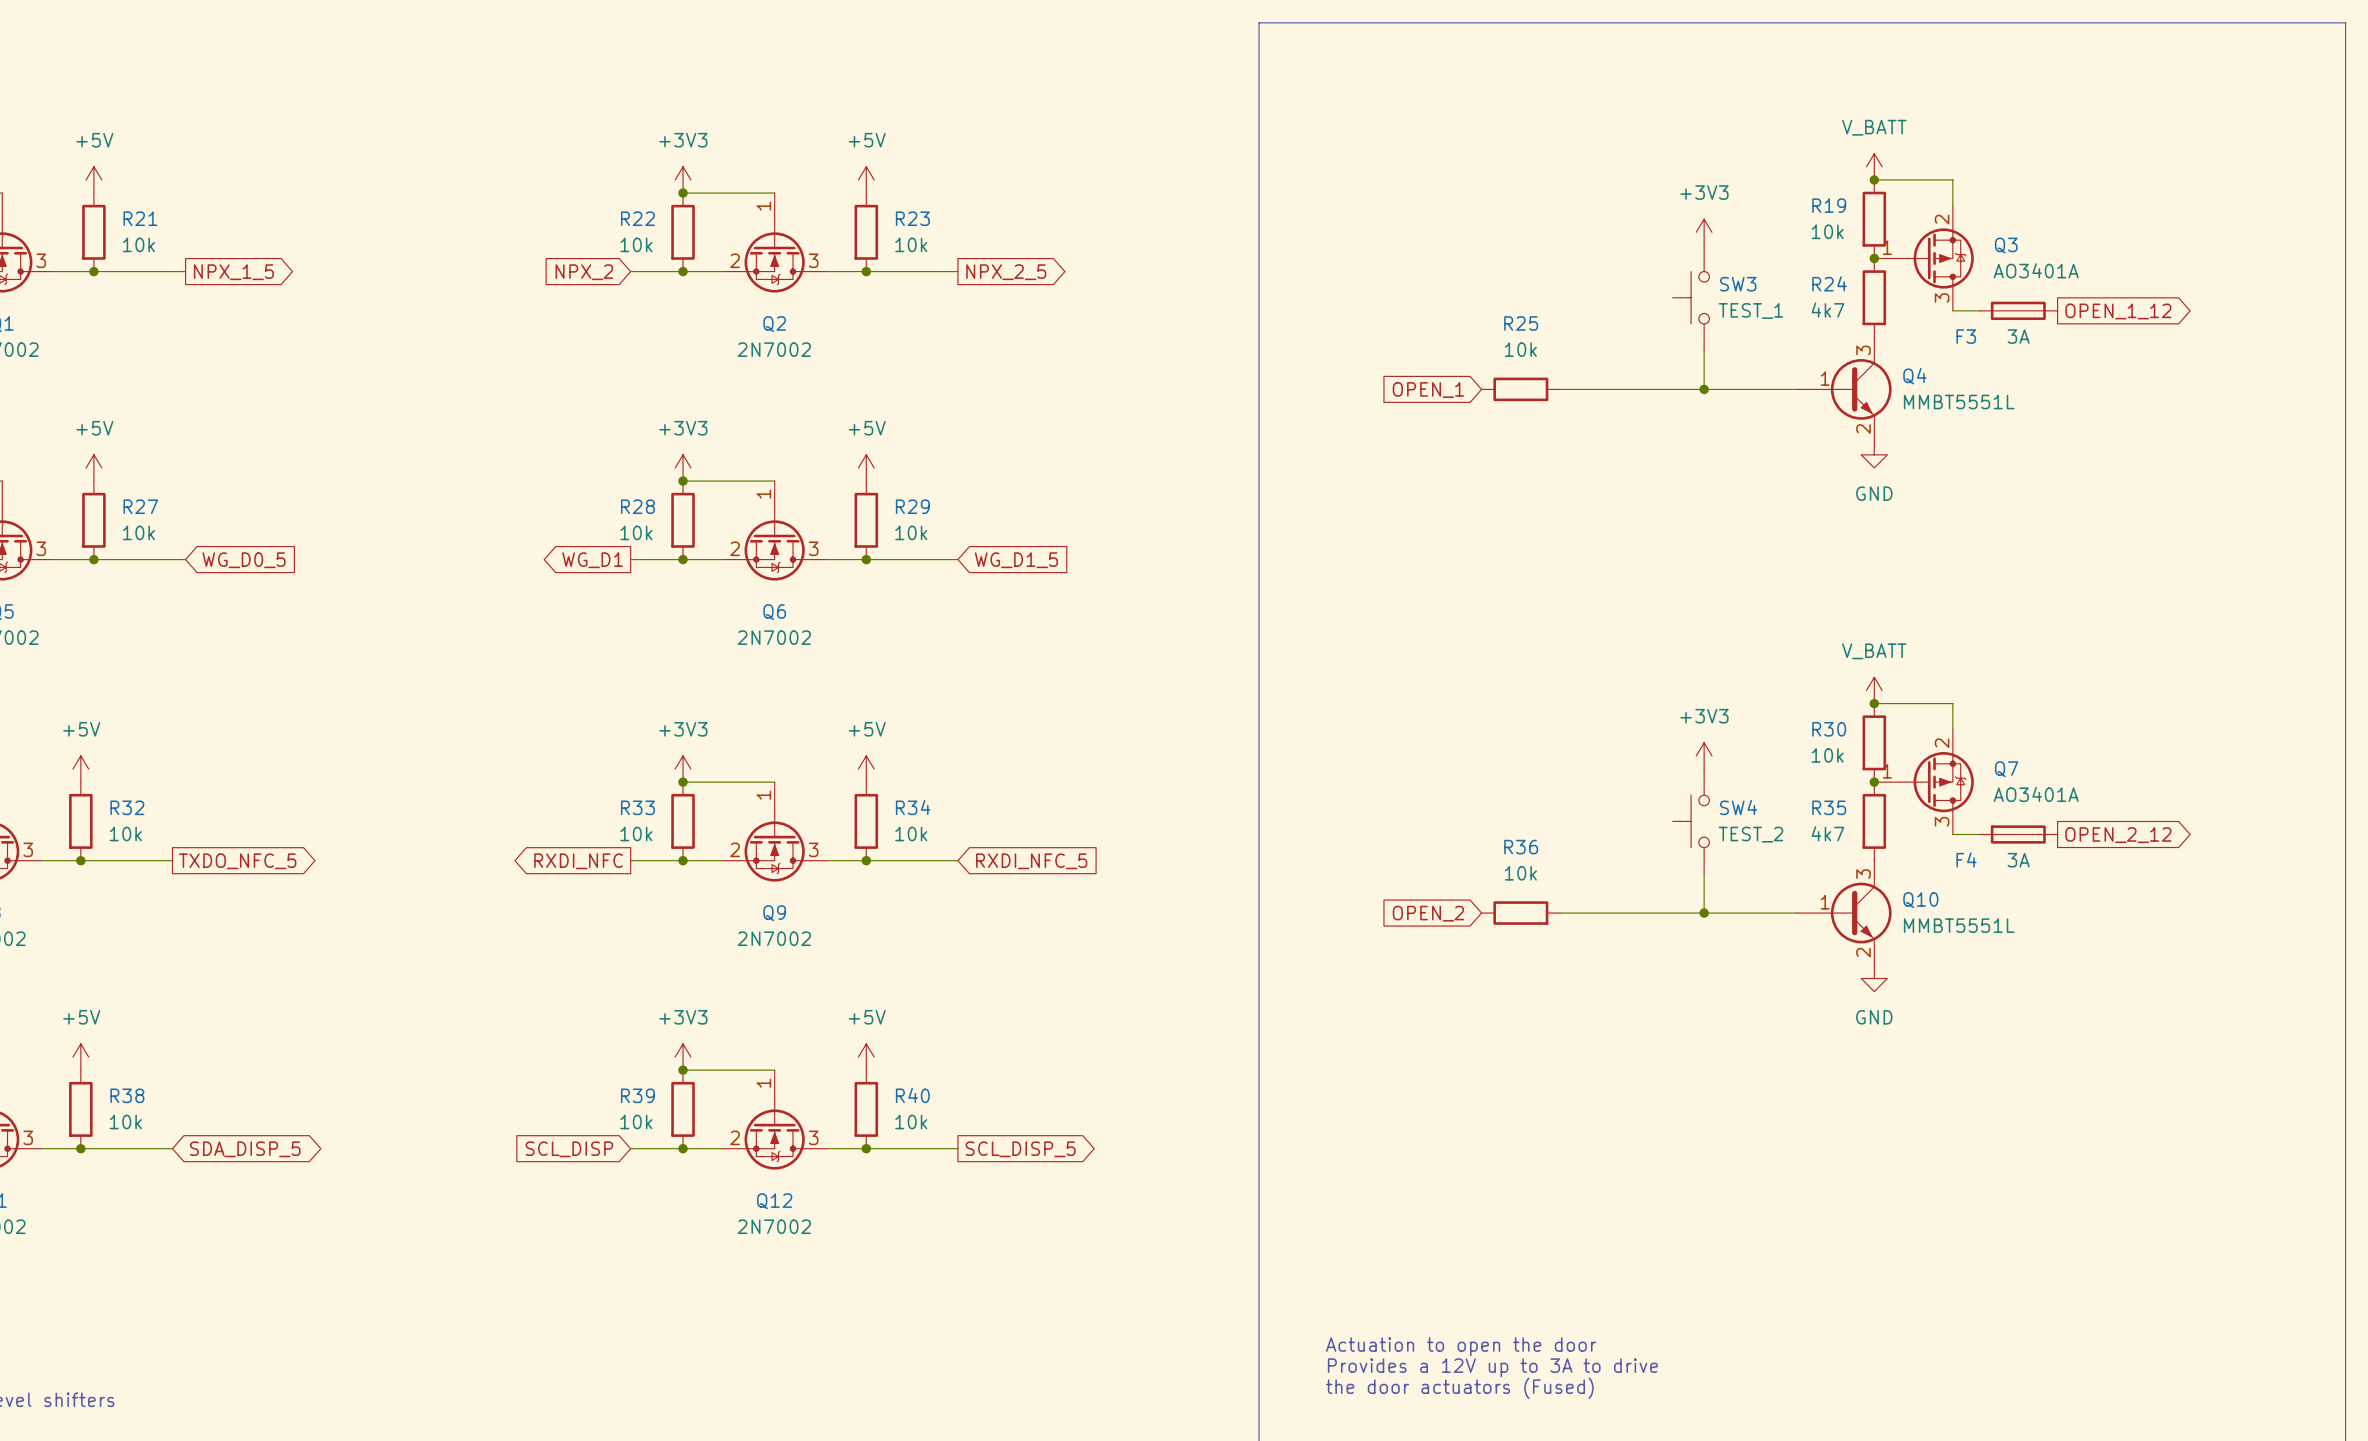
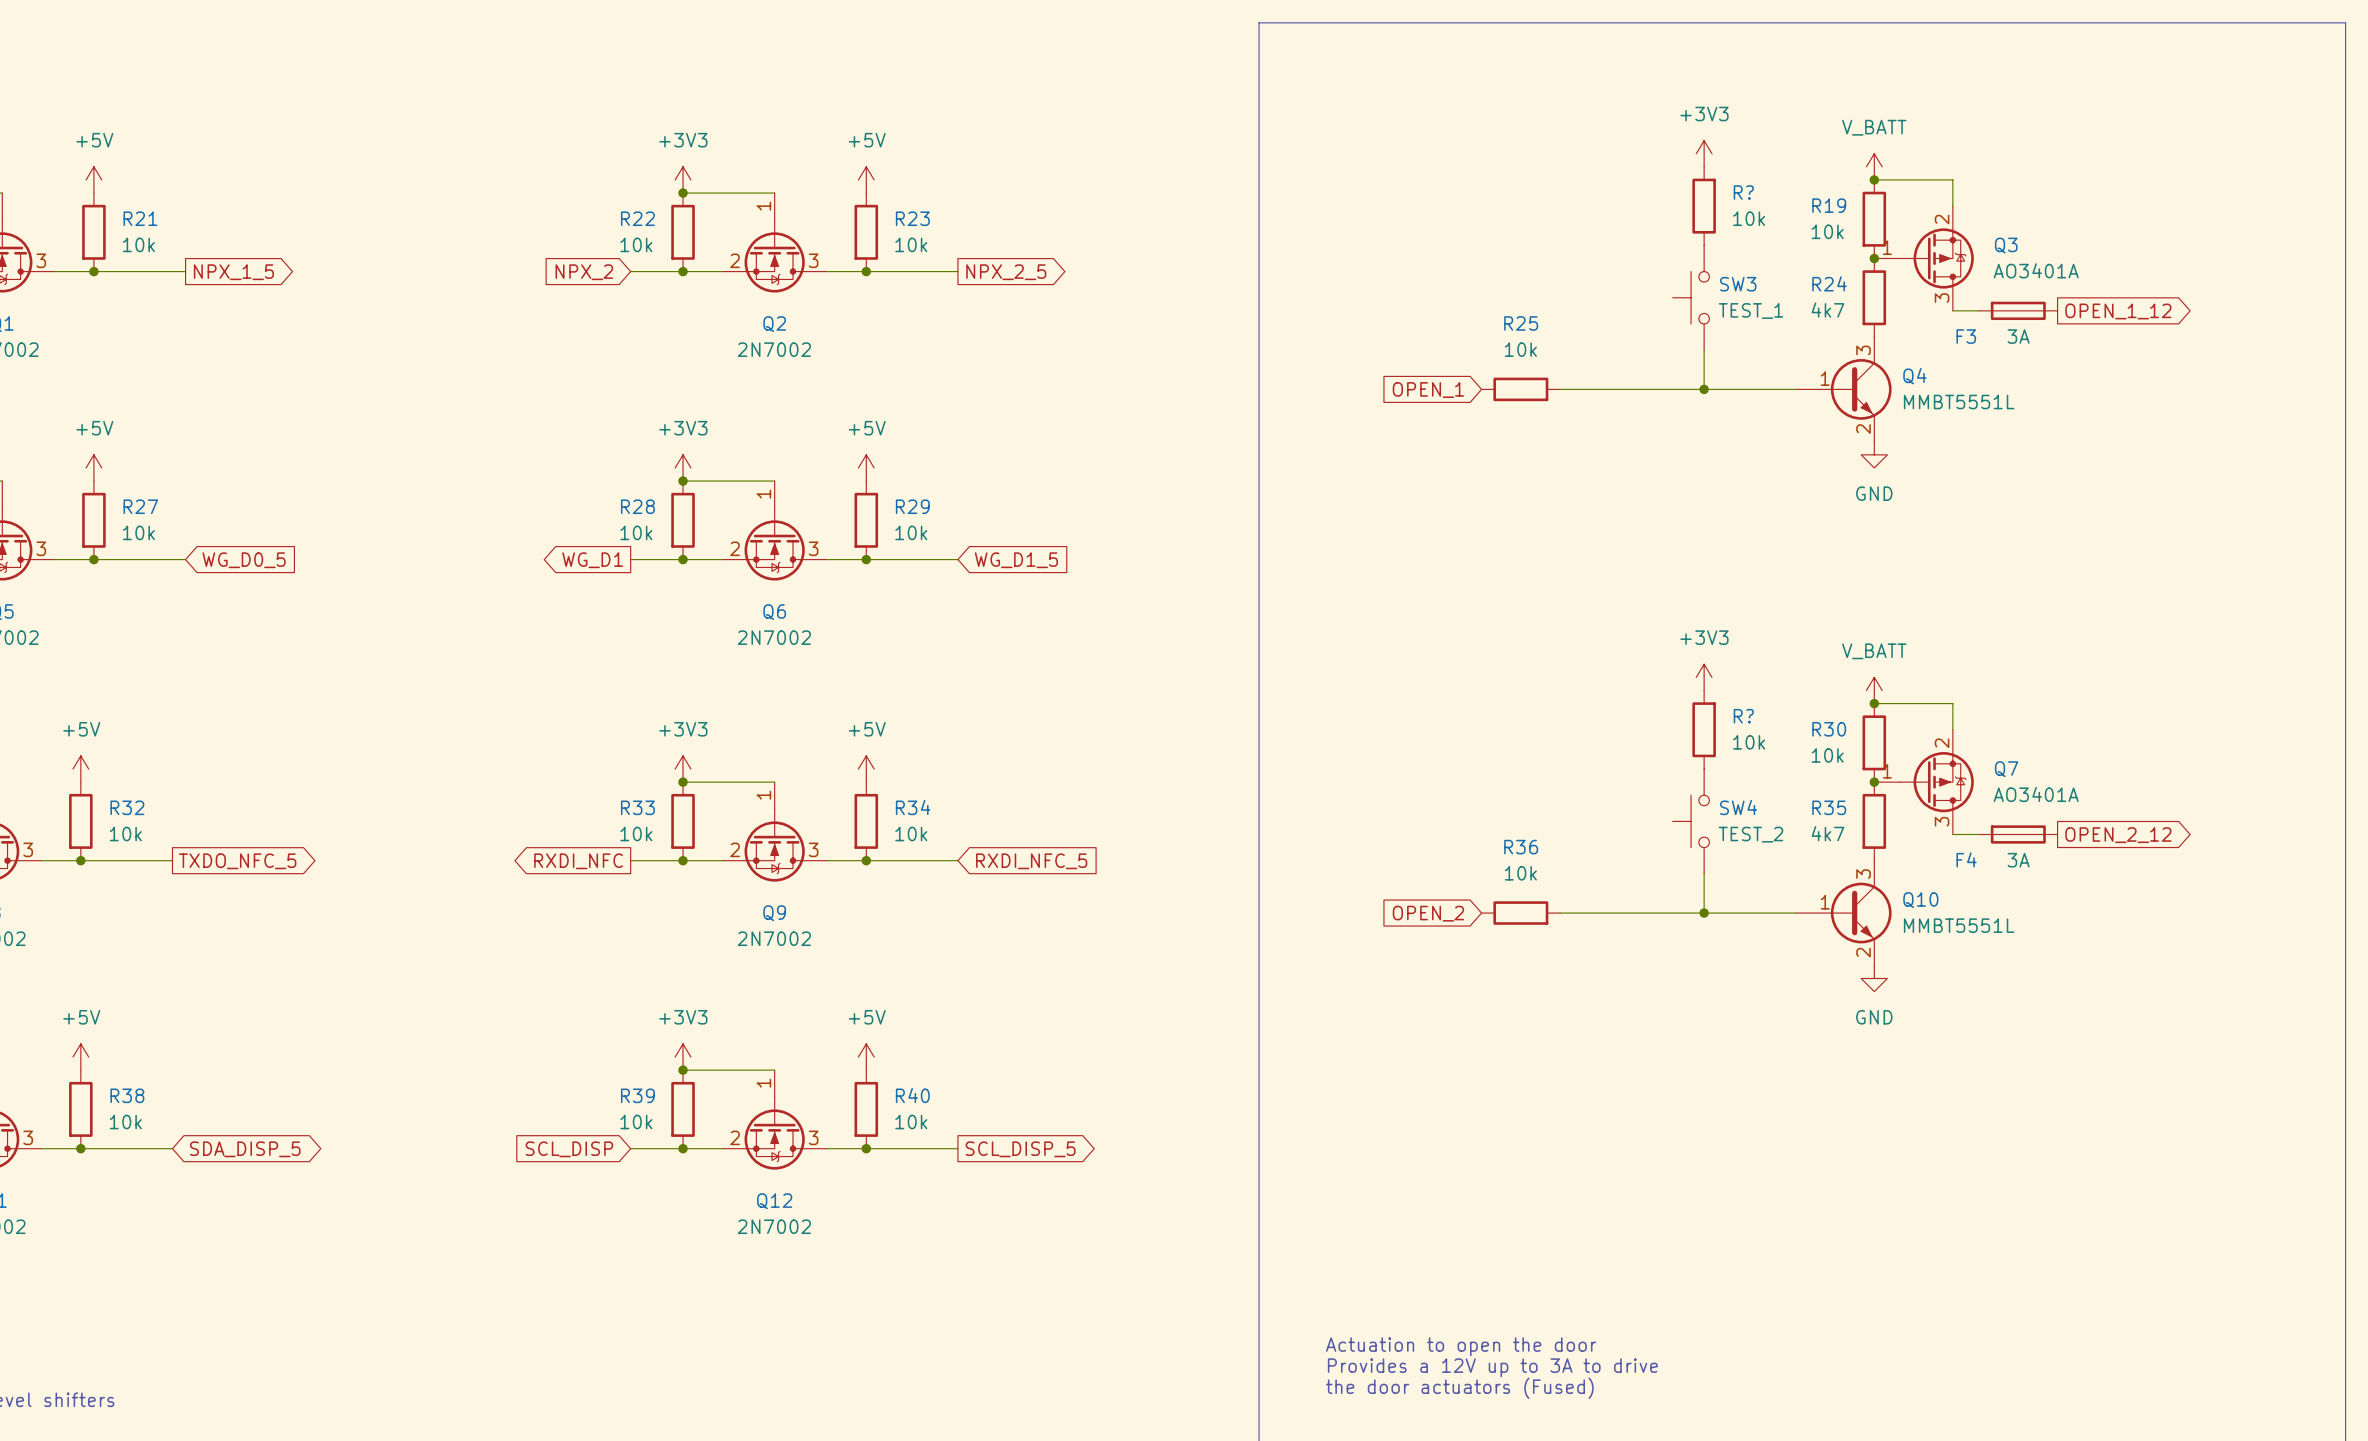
R?: none -> 10k (1704, 206)
power symbol position: +3V3 (1704, 232) -> +3V3 (1704, 153)
R?: none -> 10k (1704, 729)
power symbol position: +3V3 (1704, 755) -> +3V3 (1704, 677)

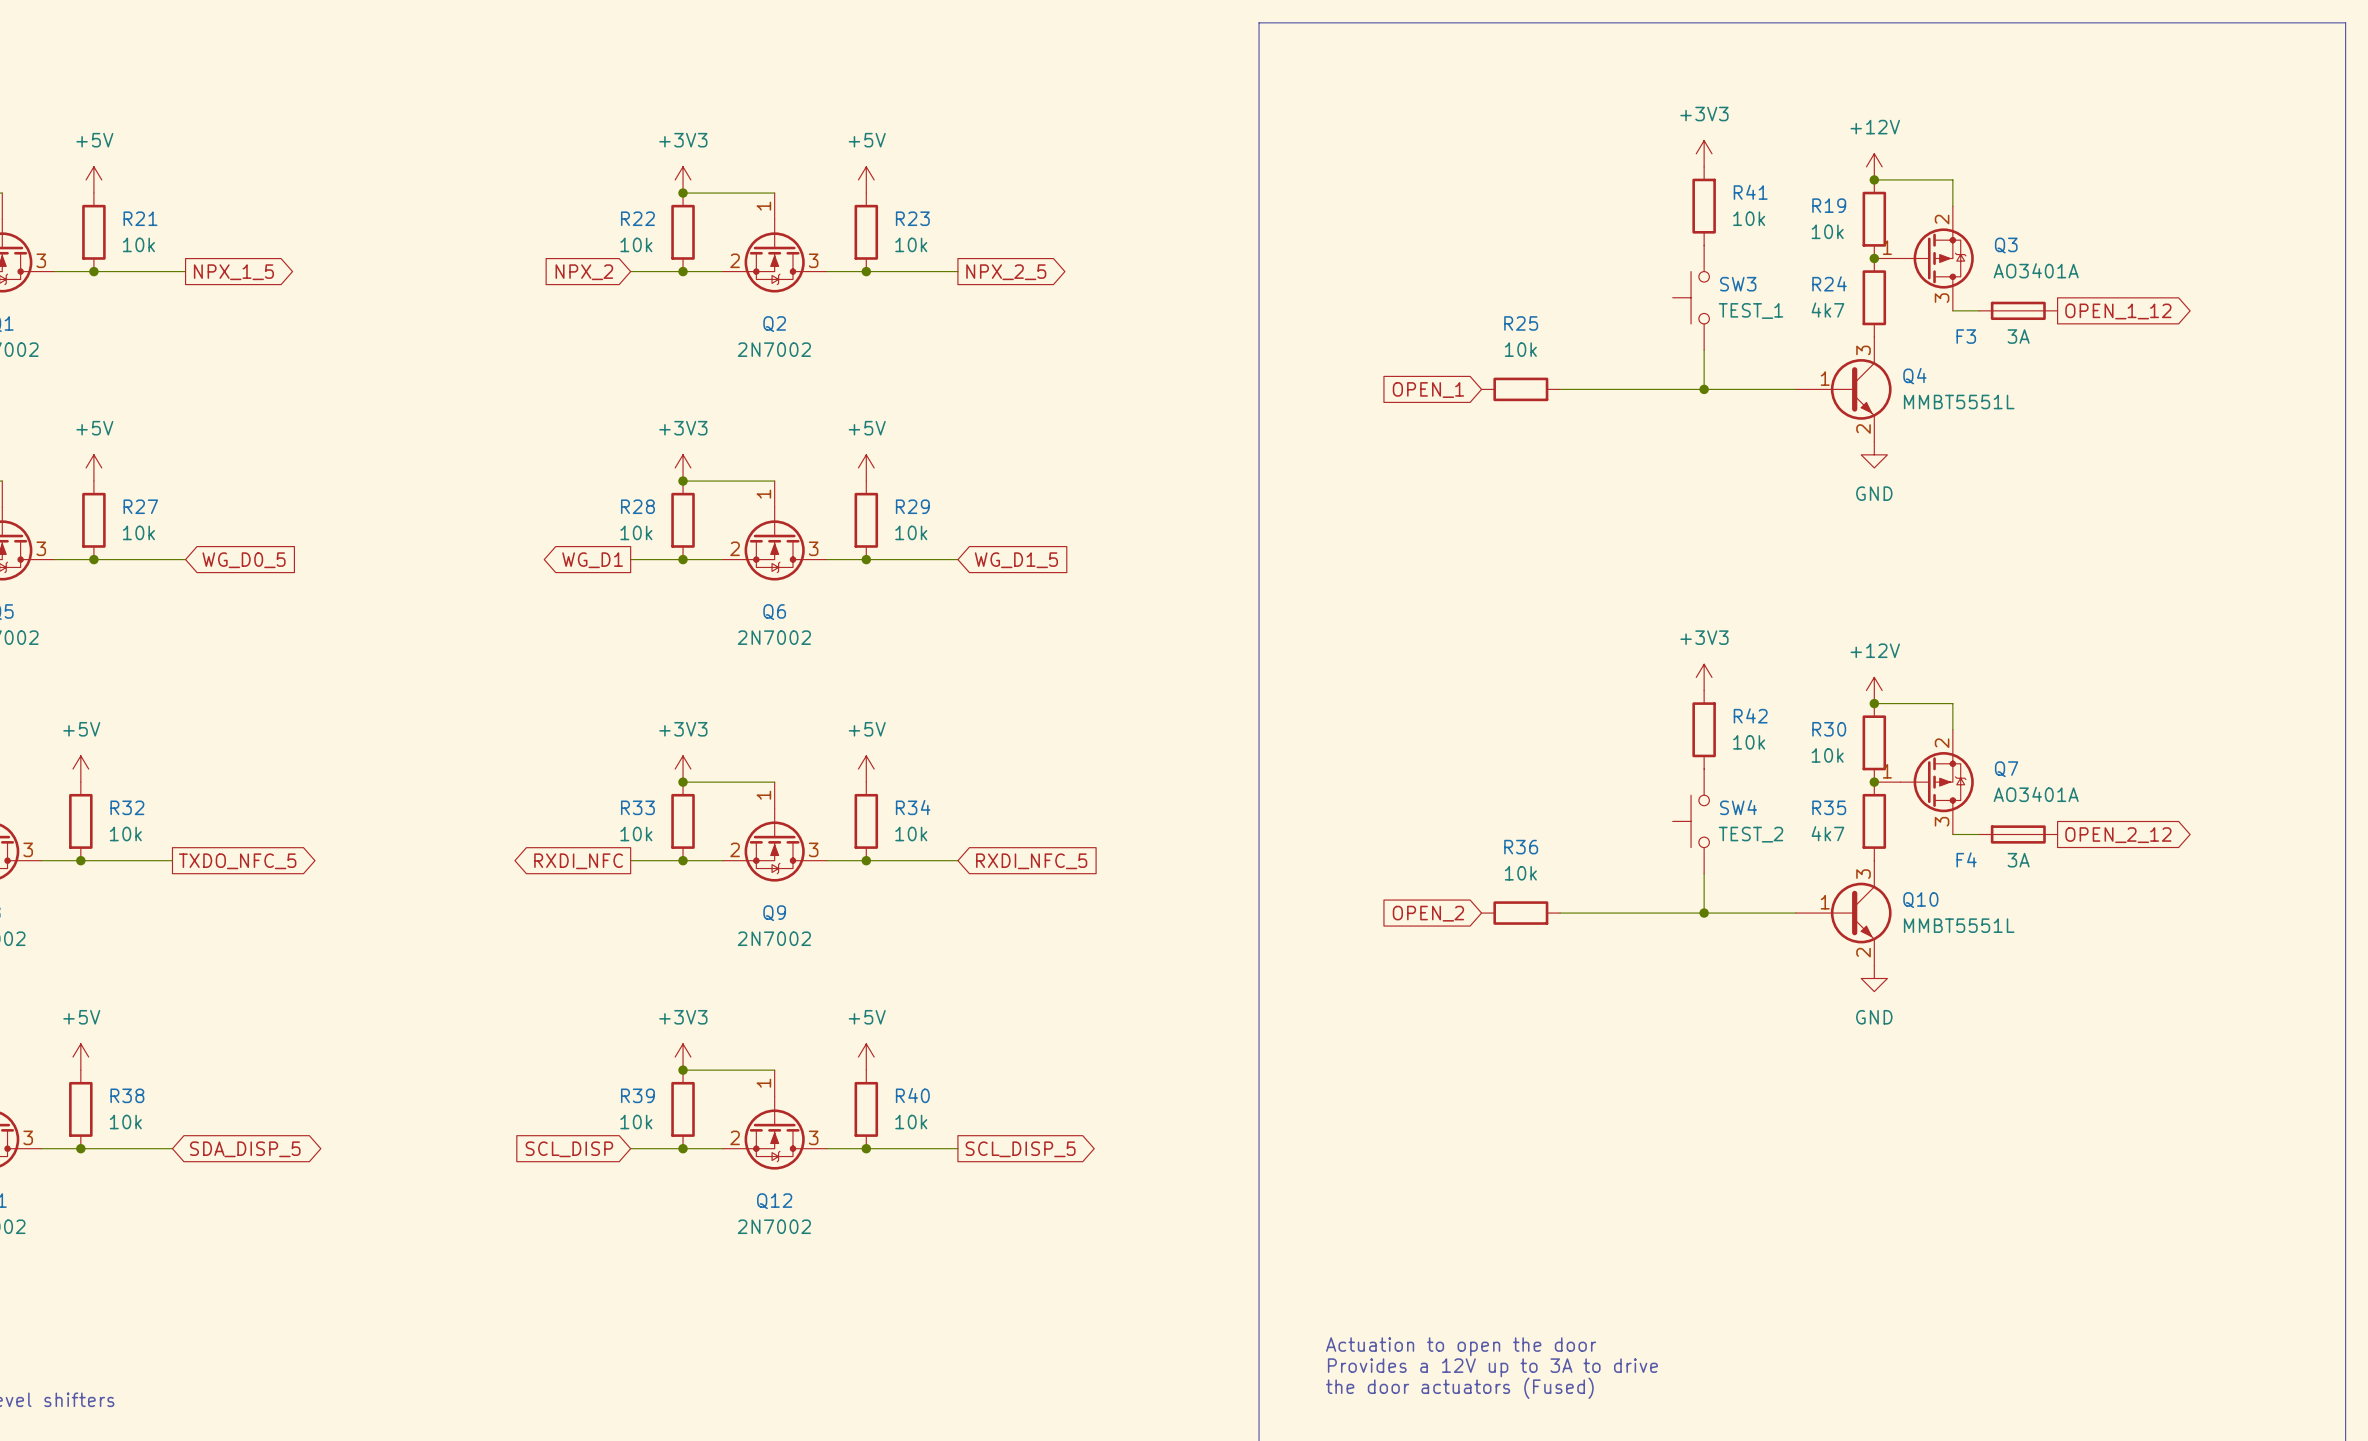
power symbol: V_BATT (1874, 166) -> +12V (1874, 166)
R? name: R? (1743, 192) -> R41 (1750, 192)
power symbol: V_BATT (1874, 690) -> +12V (1874, 690)
R? name: R? (1743, 716) -> R42 (1750, 715)

